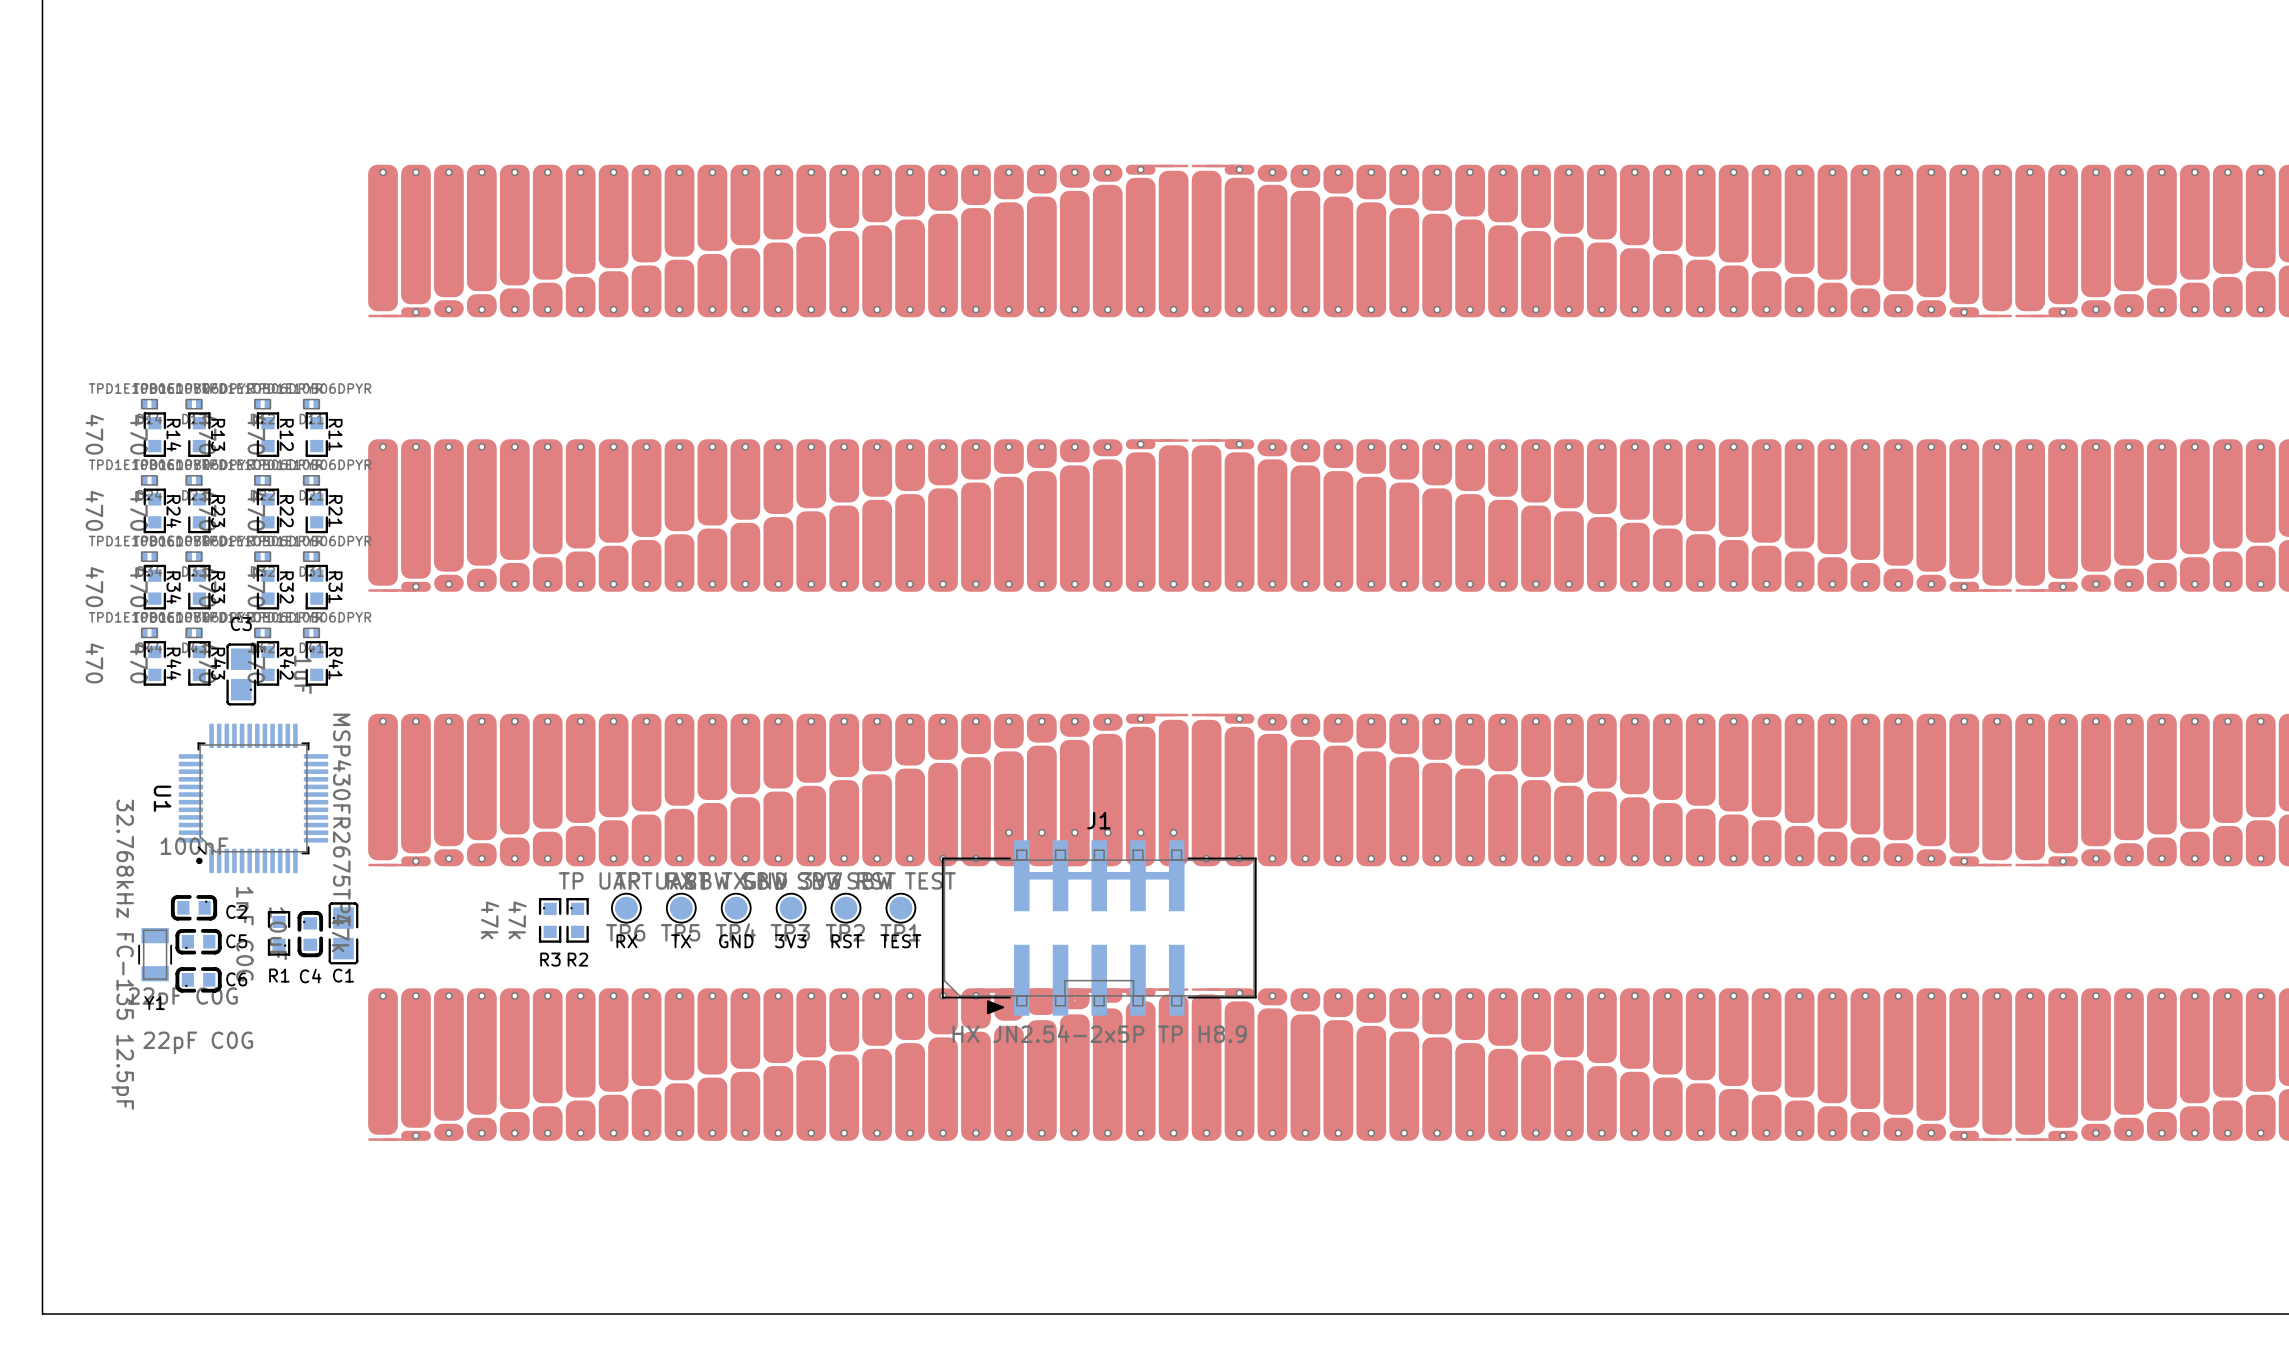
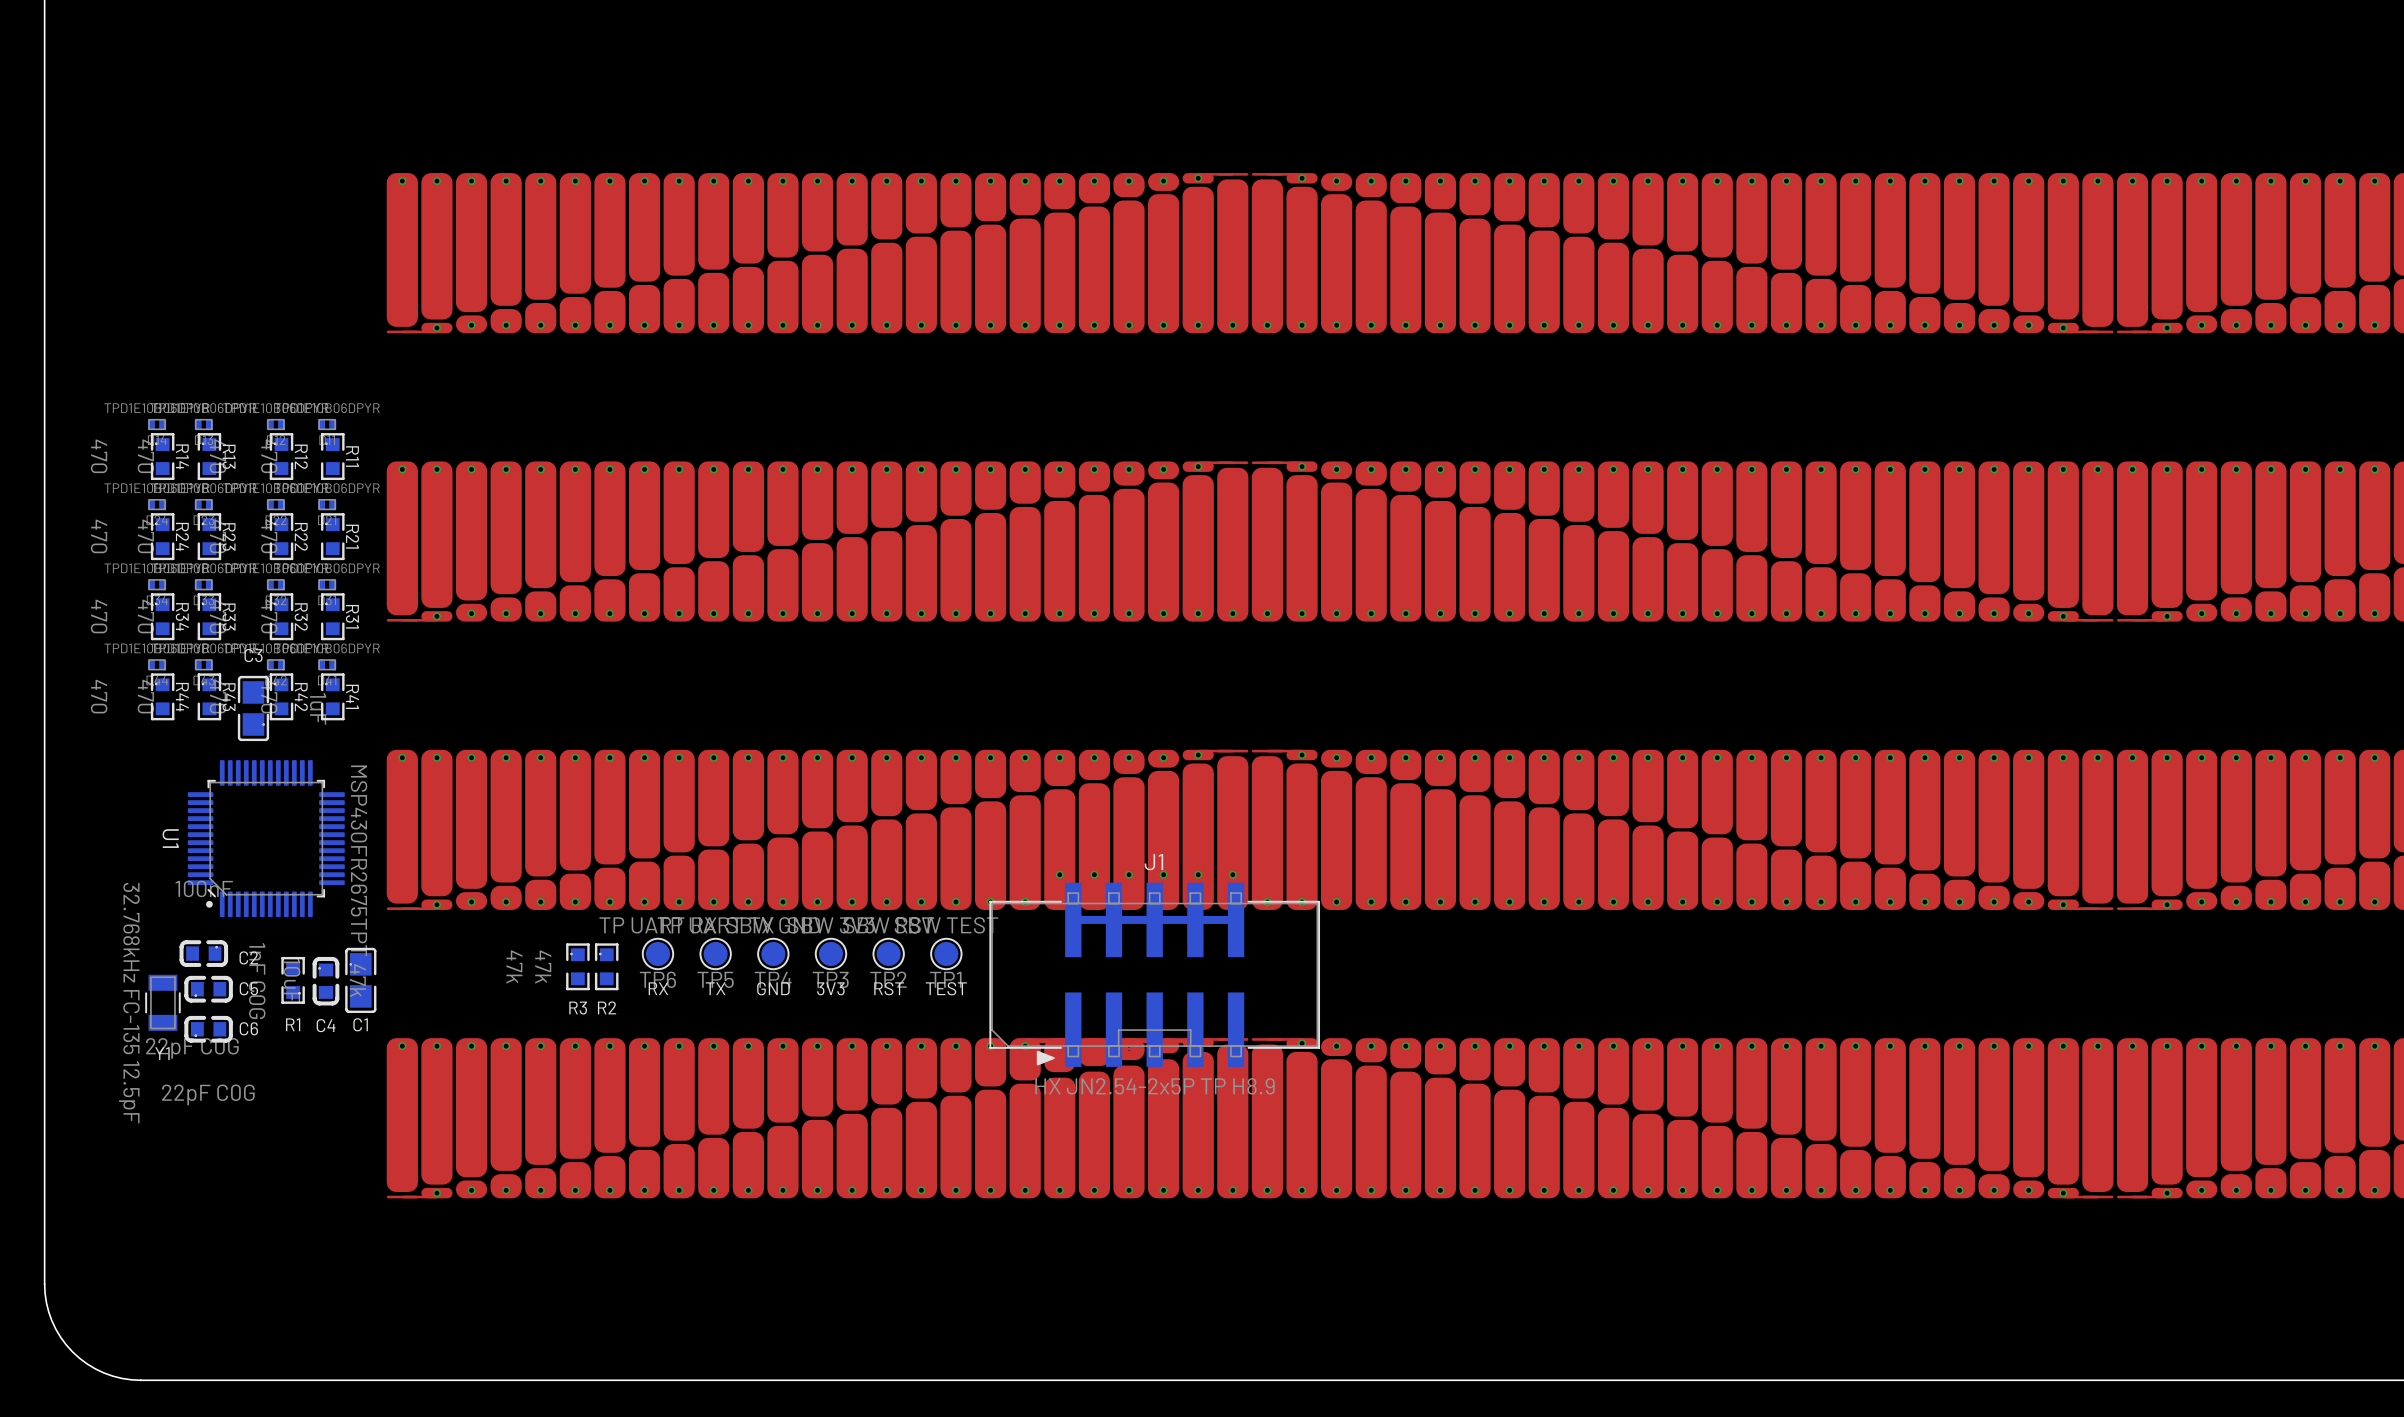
board edge: (42, 1222) (42, 1314) (134, 1314) -> (44, 1284) (46, 1302) (51, 1320) (60, 1337) (72, 1352) (87, 1364) (103, 1372) (122, 1378) (140, 1380)

